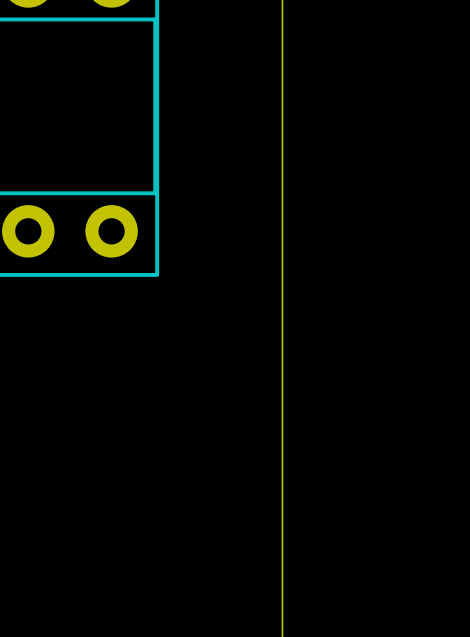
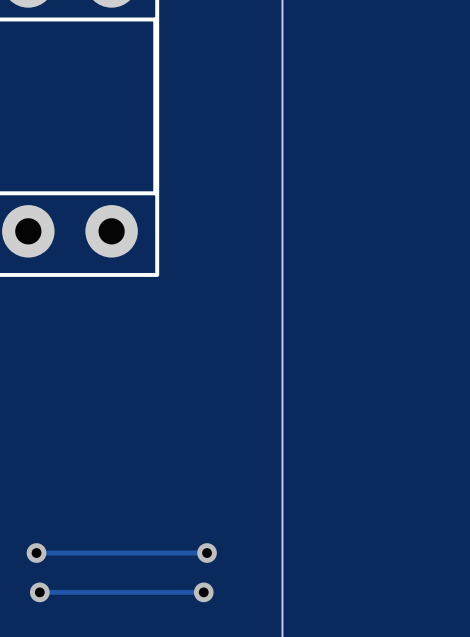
track: none -> (36, 553) (207, 553)
via: none -> (36, 553)
via: none -> (207, 553)
track: none -> (39, 592) (203, 592)
via: none -> (39, 592)
via: none -> (203, 592)

